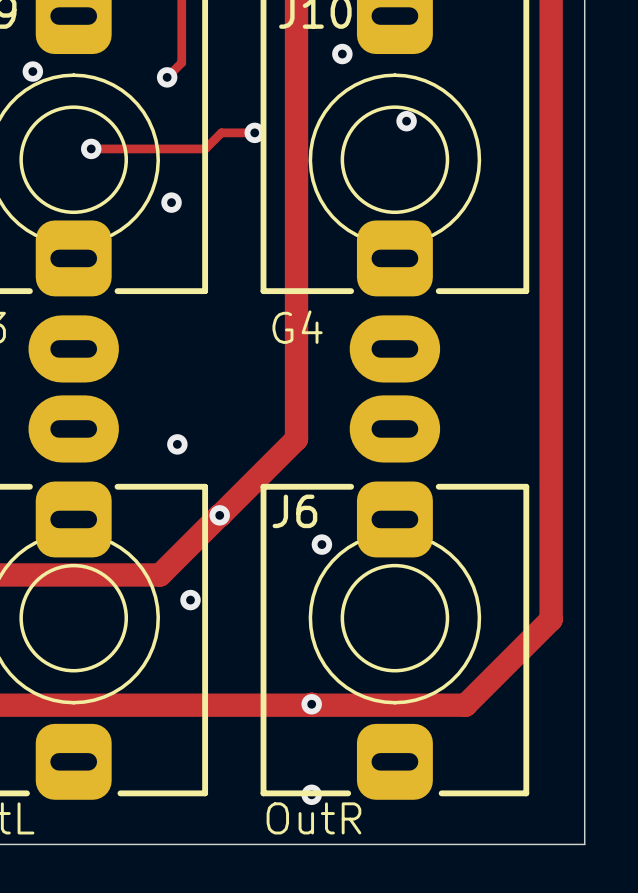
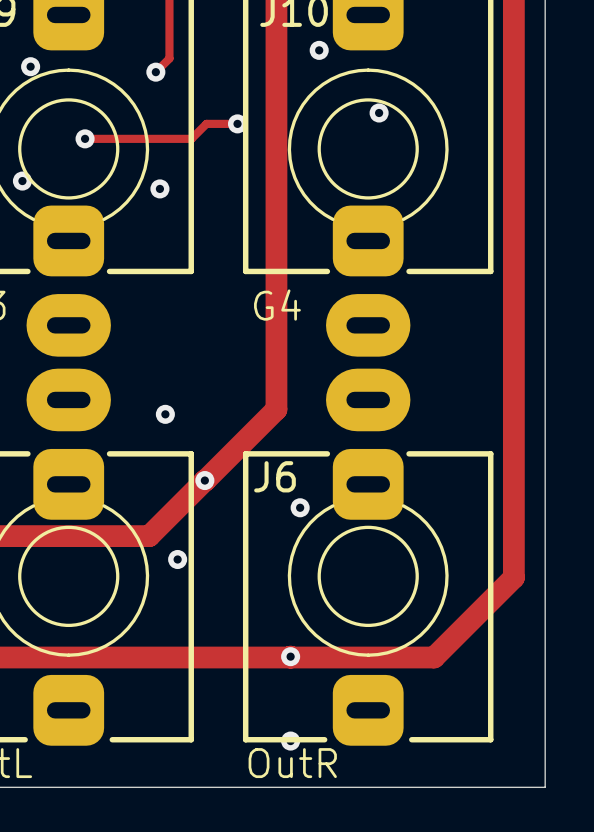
via: none -> (22, 181)

